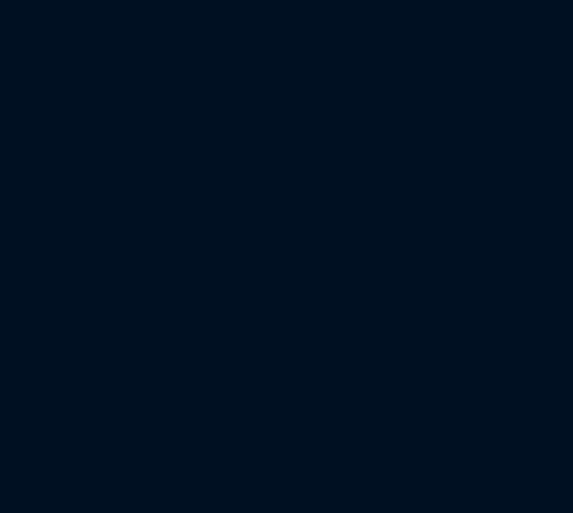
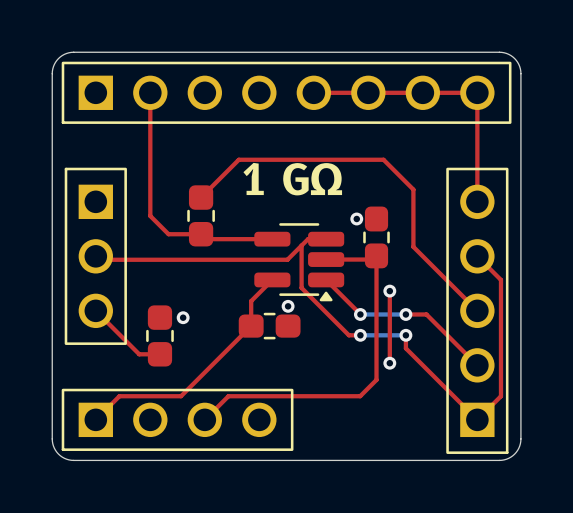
board edge: none -> (73, 52) (499, 52) (508, 54) (514, 58) (518, 64) (520, 73) (520, 438) (519, 446) (514, 454) (508, 458) (499, 460) (73, 460) (64, 458) (58, 454) (53, 446) (52, 438) (52, 73) (54, 64) (58, 58) (66, 53) (73, 52)
top track: none -> (150, 92) (150, 215) (168, 234) (201, 234) (206, 239) (272, 239)
part: none -> (286, 92)
top track: none -> (313, 92) (477, 92) (477, 201)
text: none -> 1 GΩ (292, 179)
top track: none -> (201, 197) (238, 159) (383, 159) (413, 189) (413, 246) (477, 310)
part: none -> (201, 215)
via: none -> (356, 218)
part: none -> (376, 237)
top track: none -> (326, 239) (308, 239) (287, 259) (99, 259) (95, 256)
top track: none -> (301, 245) (301, 287) (348, 335) (360, 335)
part: none -> (95, 256)
top track: none -> (477, 256) (500, 279) (500, 396) (477, 419) (405, 348) (405, 335)
top track: none -> (326, 259) (372, 259) (376, 255) (376, 379) (360, 396) (228, 396) (204, 419)
part: none -> (299, 262)
top track: none -> (272, 279) (251, 301) (251, 326) (181, 396) (119, 396) (95, 419)
top track: none -> (326, 279) (360, 314)
top track: none -> (389, 291) (389, 363)
via: none -> (389, 291)
via: none -> (288, 306)
top track: none -> (95, 310) (139, 354) (159, 354)
part: none -> (477, 310)
bottom track: none -> (360, 314) (405, 314)
via: none -> (360, 314)
top track: none -> (405, 314) (426, 314) (477, 365)
via: none -> (405, 314)
via: none -> (183, 317)
part: none -> (269, 326)
part: none -> (159, 335)
bottom track: none -> (360, 335) (405, 335)
via: none -> (360, 335)
via: none -> (405, 335)
via: none -> (389, 363)
part: none -> (177, 419)

